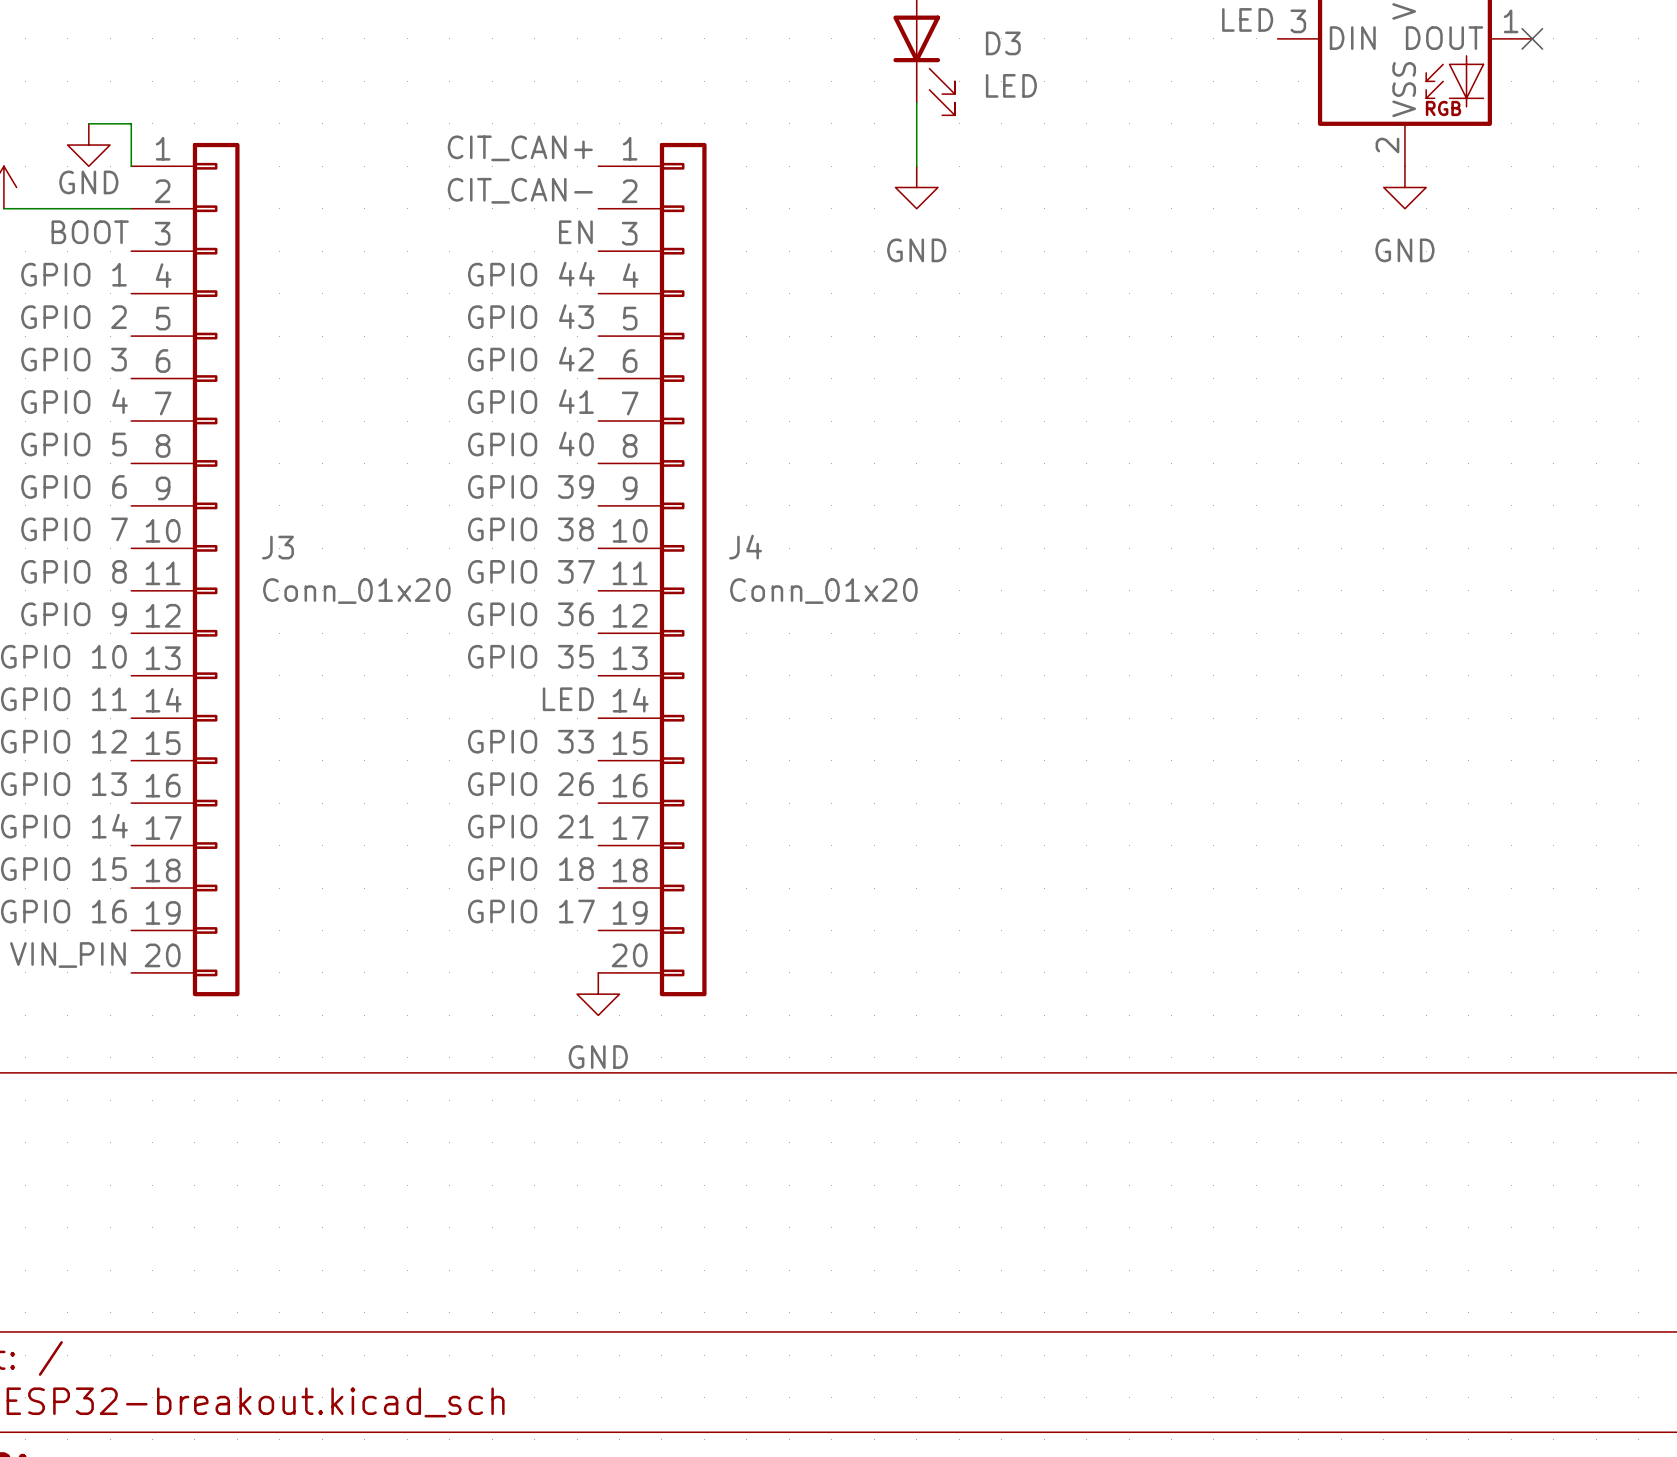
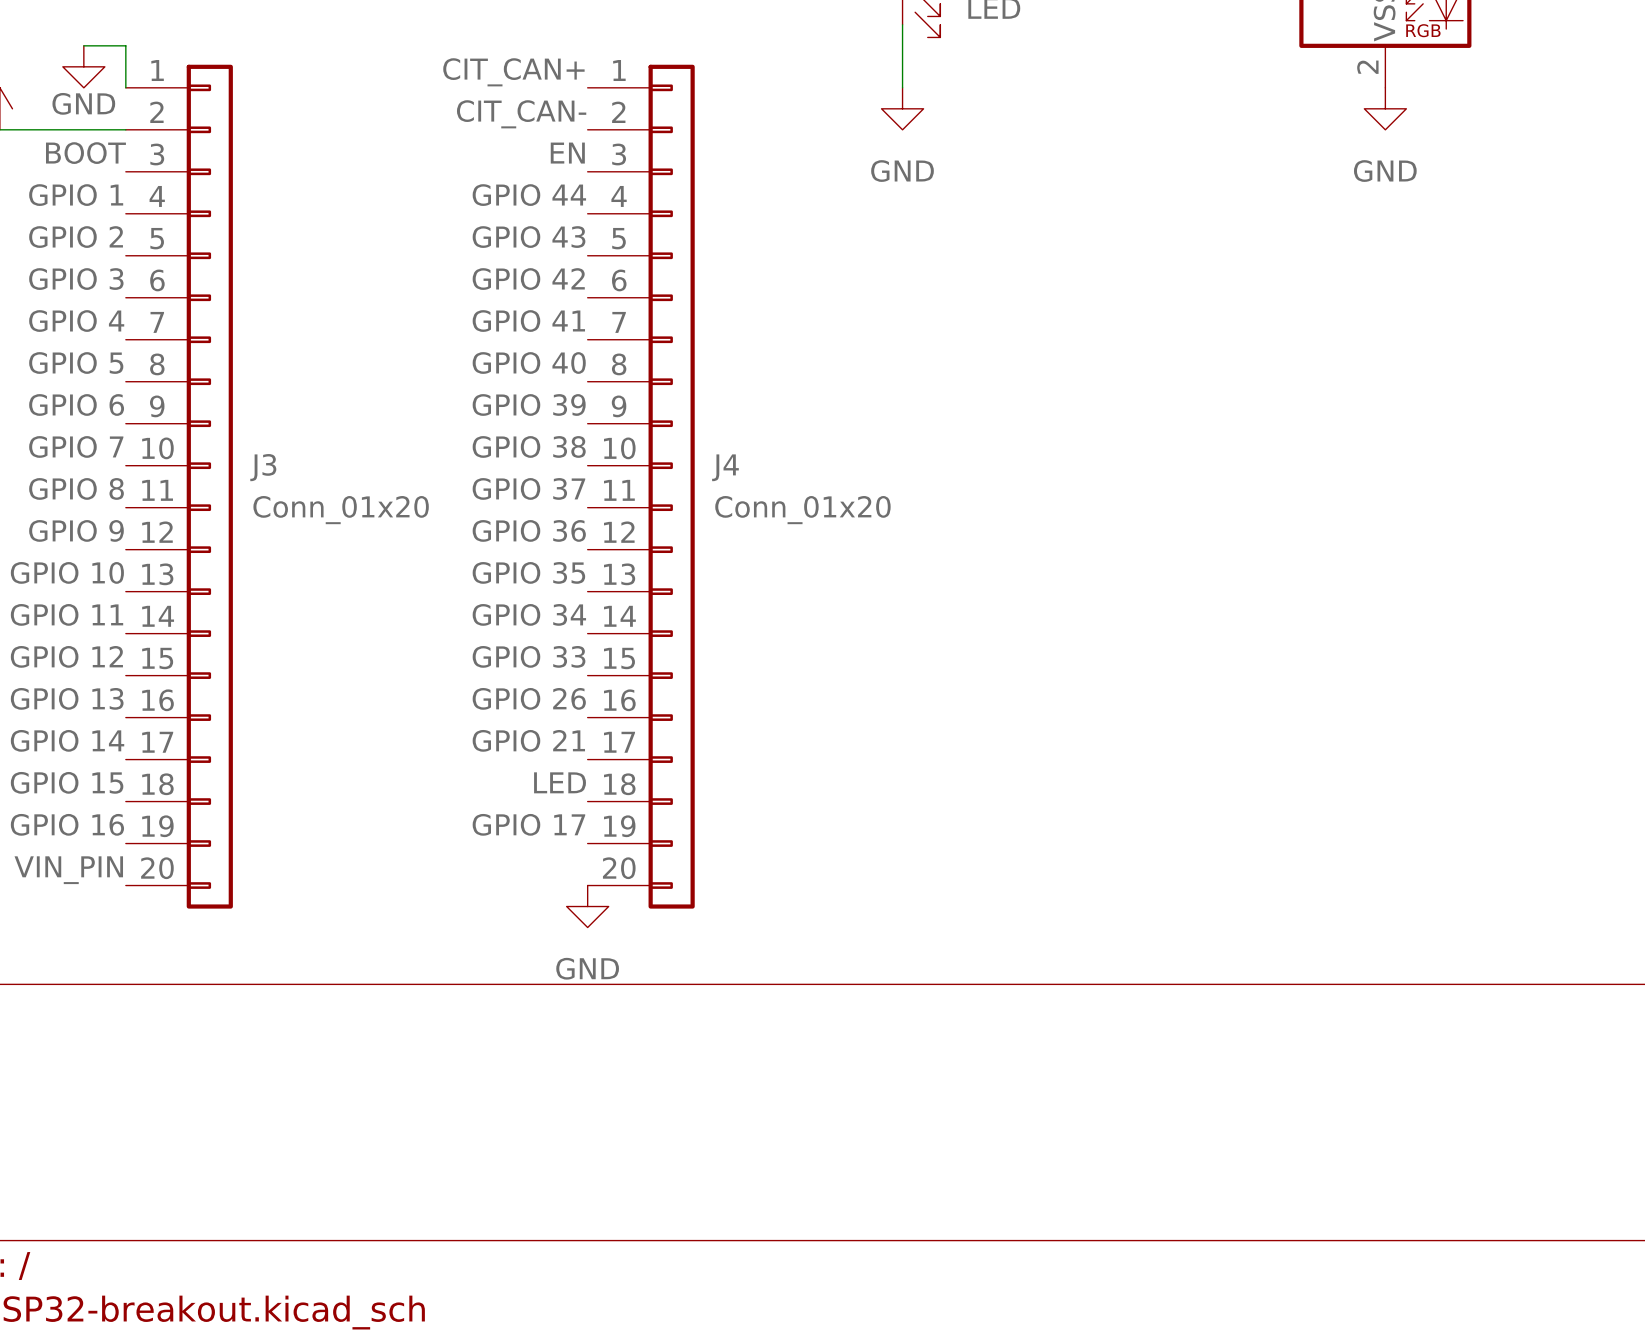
label: LED (568, 699) -> GPIO 34 (529, 614)
label: GPIO 18 (530, 869) -> LED (560, 782)

